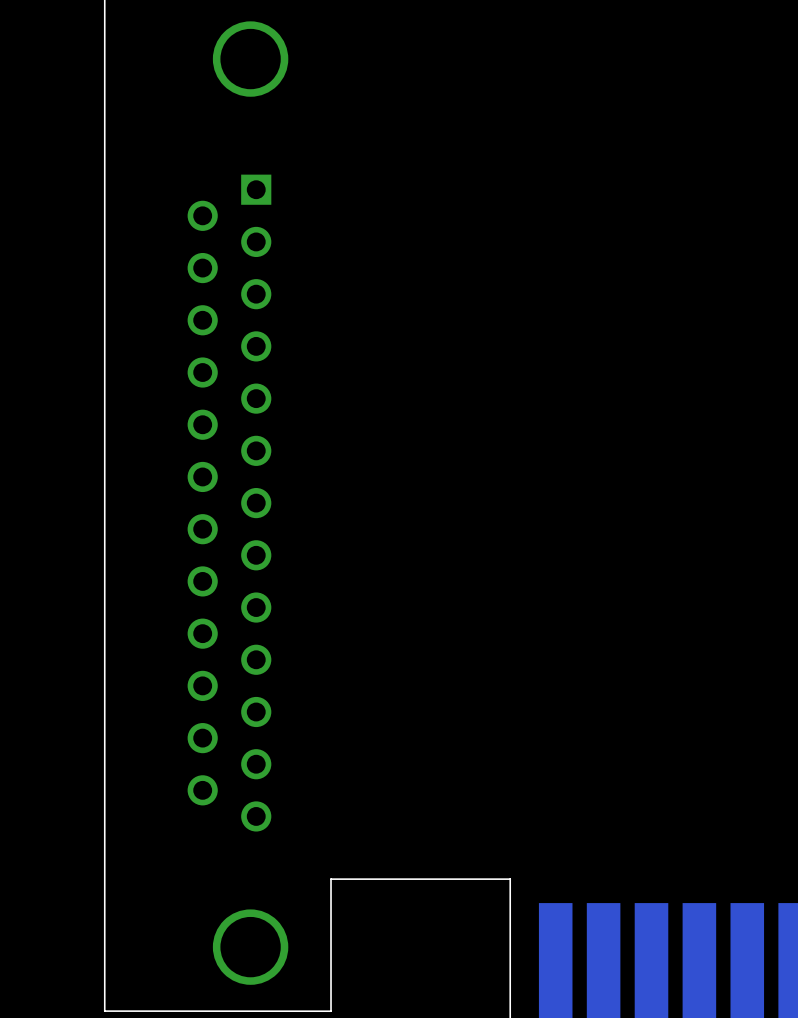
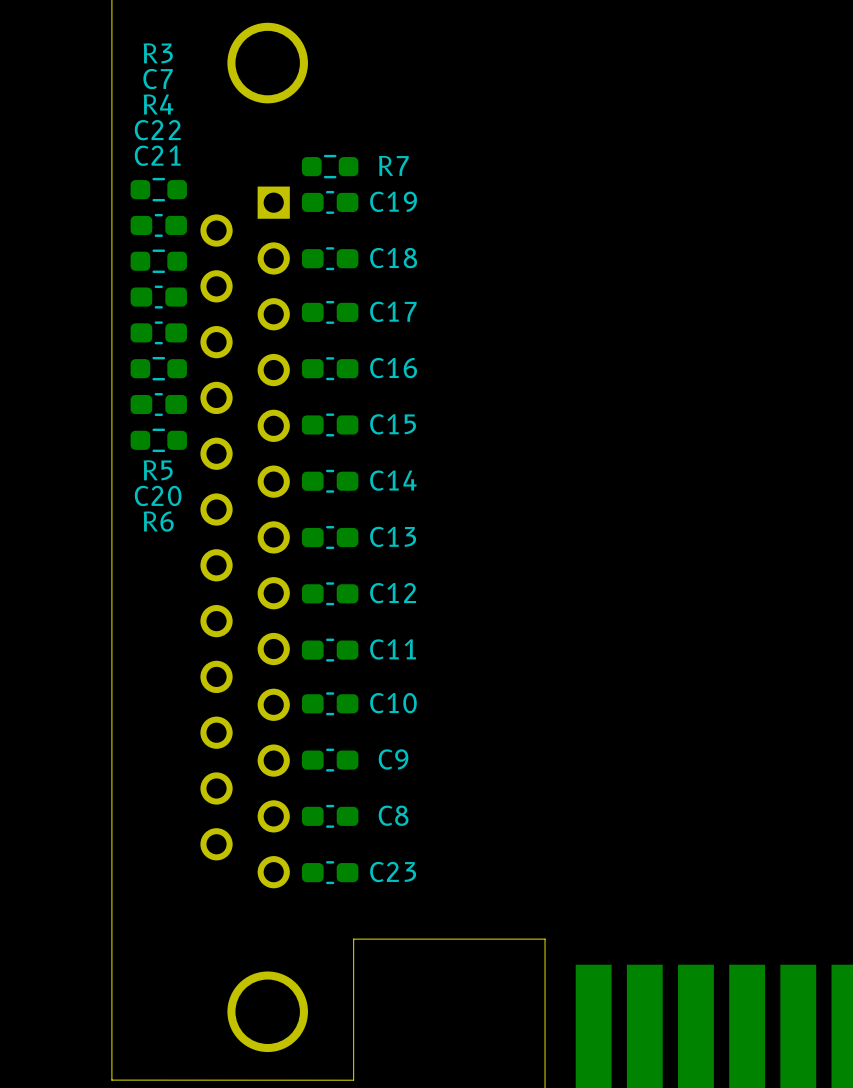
R7: none -> (330, 166)
R3: none -> (158, 189)
C19: none -> (330, 202)
C7: none -> (158, 225)
C18: none -> (330, 258)
R4: none -> (158, 261)
C22: none -> (158, 297)
C17: none -> (330, 312)
C21: none -> (158, 332)
R5: none -> (158, 368)
C16: none -> (330, 368)
C20: none -> (158, 404)
C15: none -> (330, 424)
R6: none -> (158, 440)
C14: none -> (330, 481)
C13: none -> (330, 537)
C12: none -> (330, 593)
C11: none -> (330, 650)
C10: none -> (330, 703)
C9: none -> (330, 760)
C8: none -> (330, 816)
C23: none -> (330, 872)

